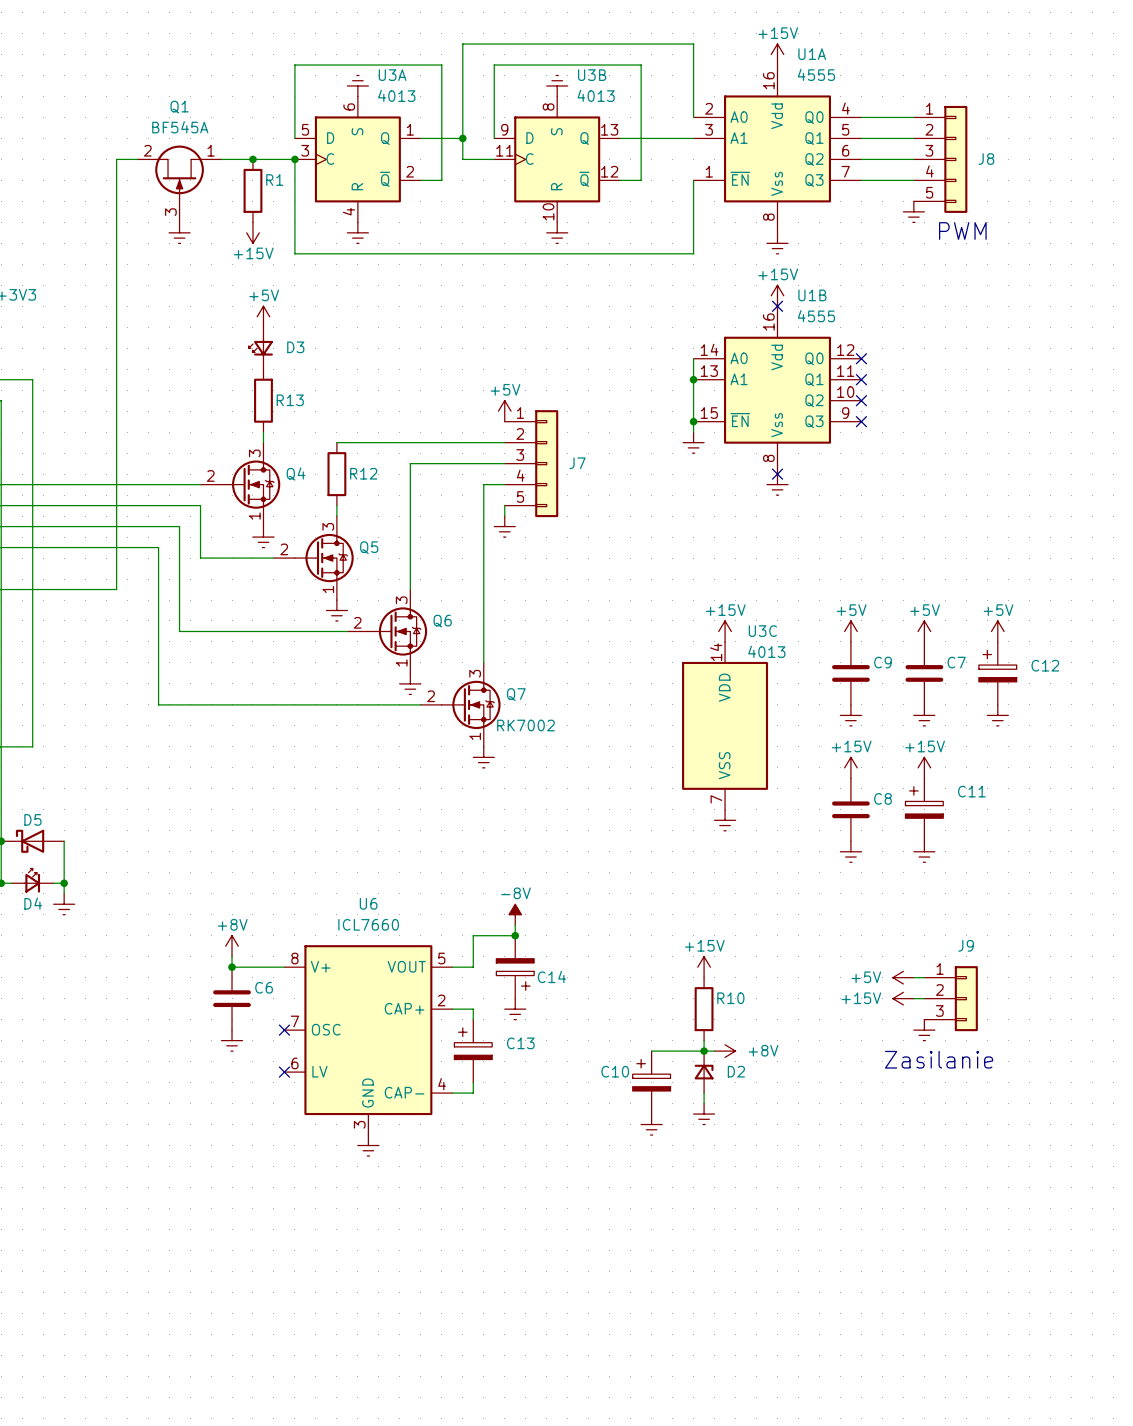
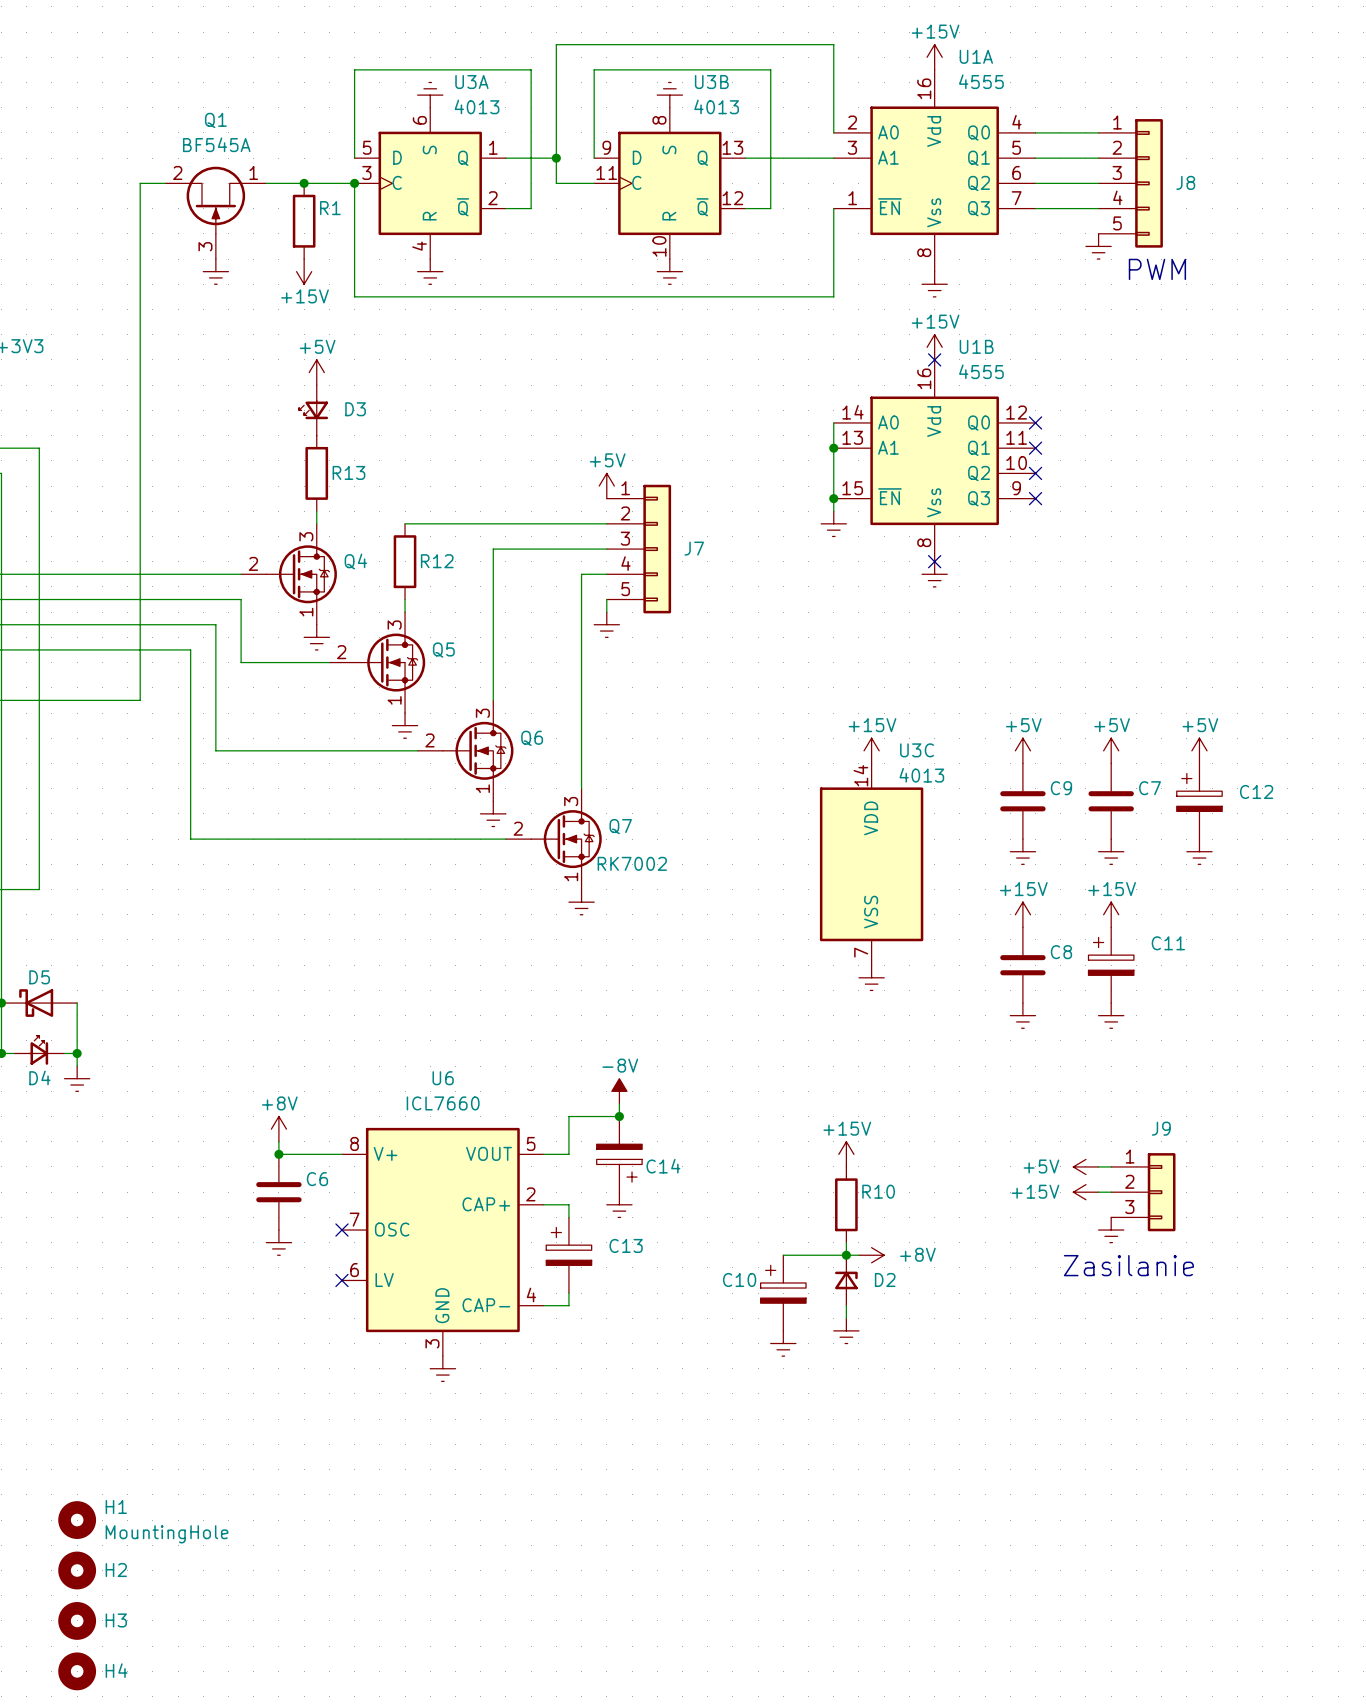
H1: none -> MountingHole (77, 1520)
H2: none -> (77, 1570)
H3: none -> (77, 1620)
H4: none -> (77, 1671)

